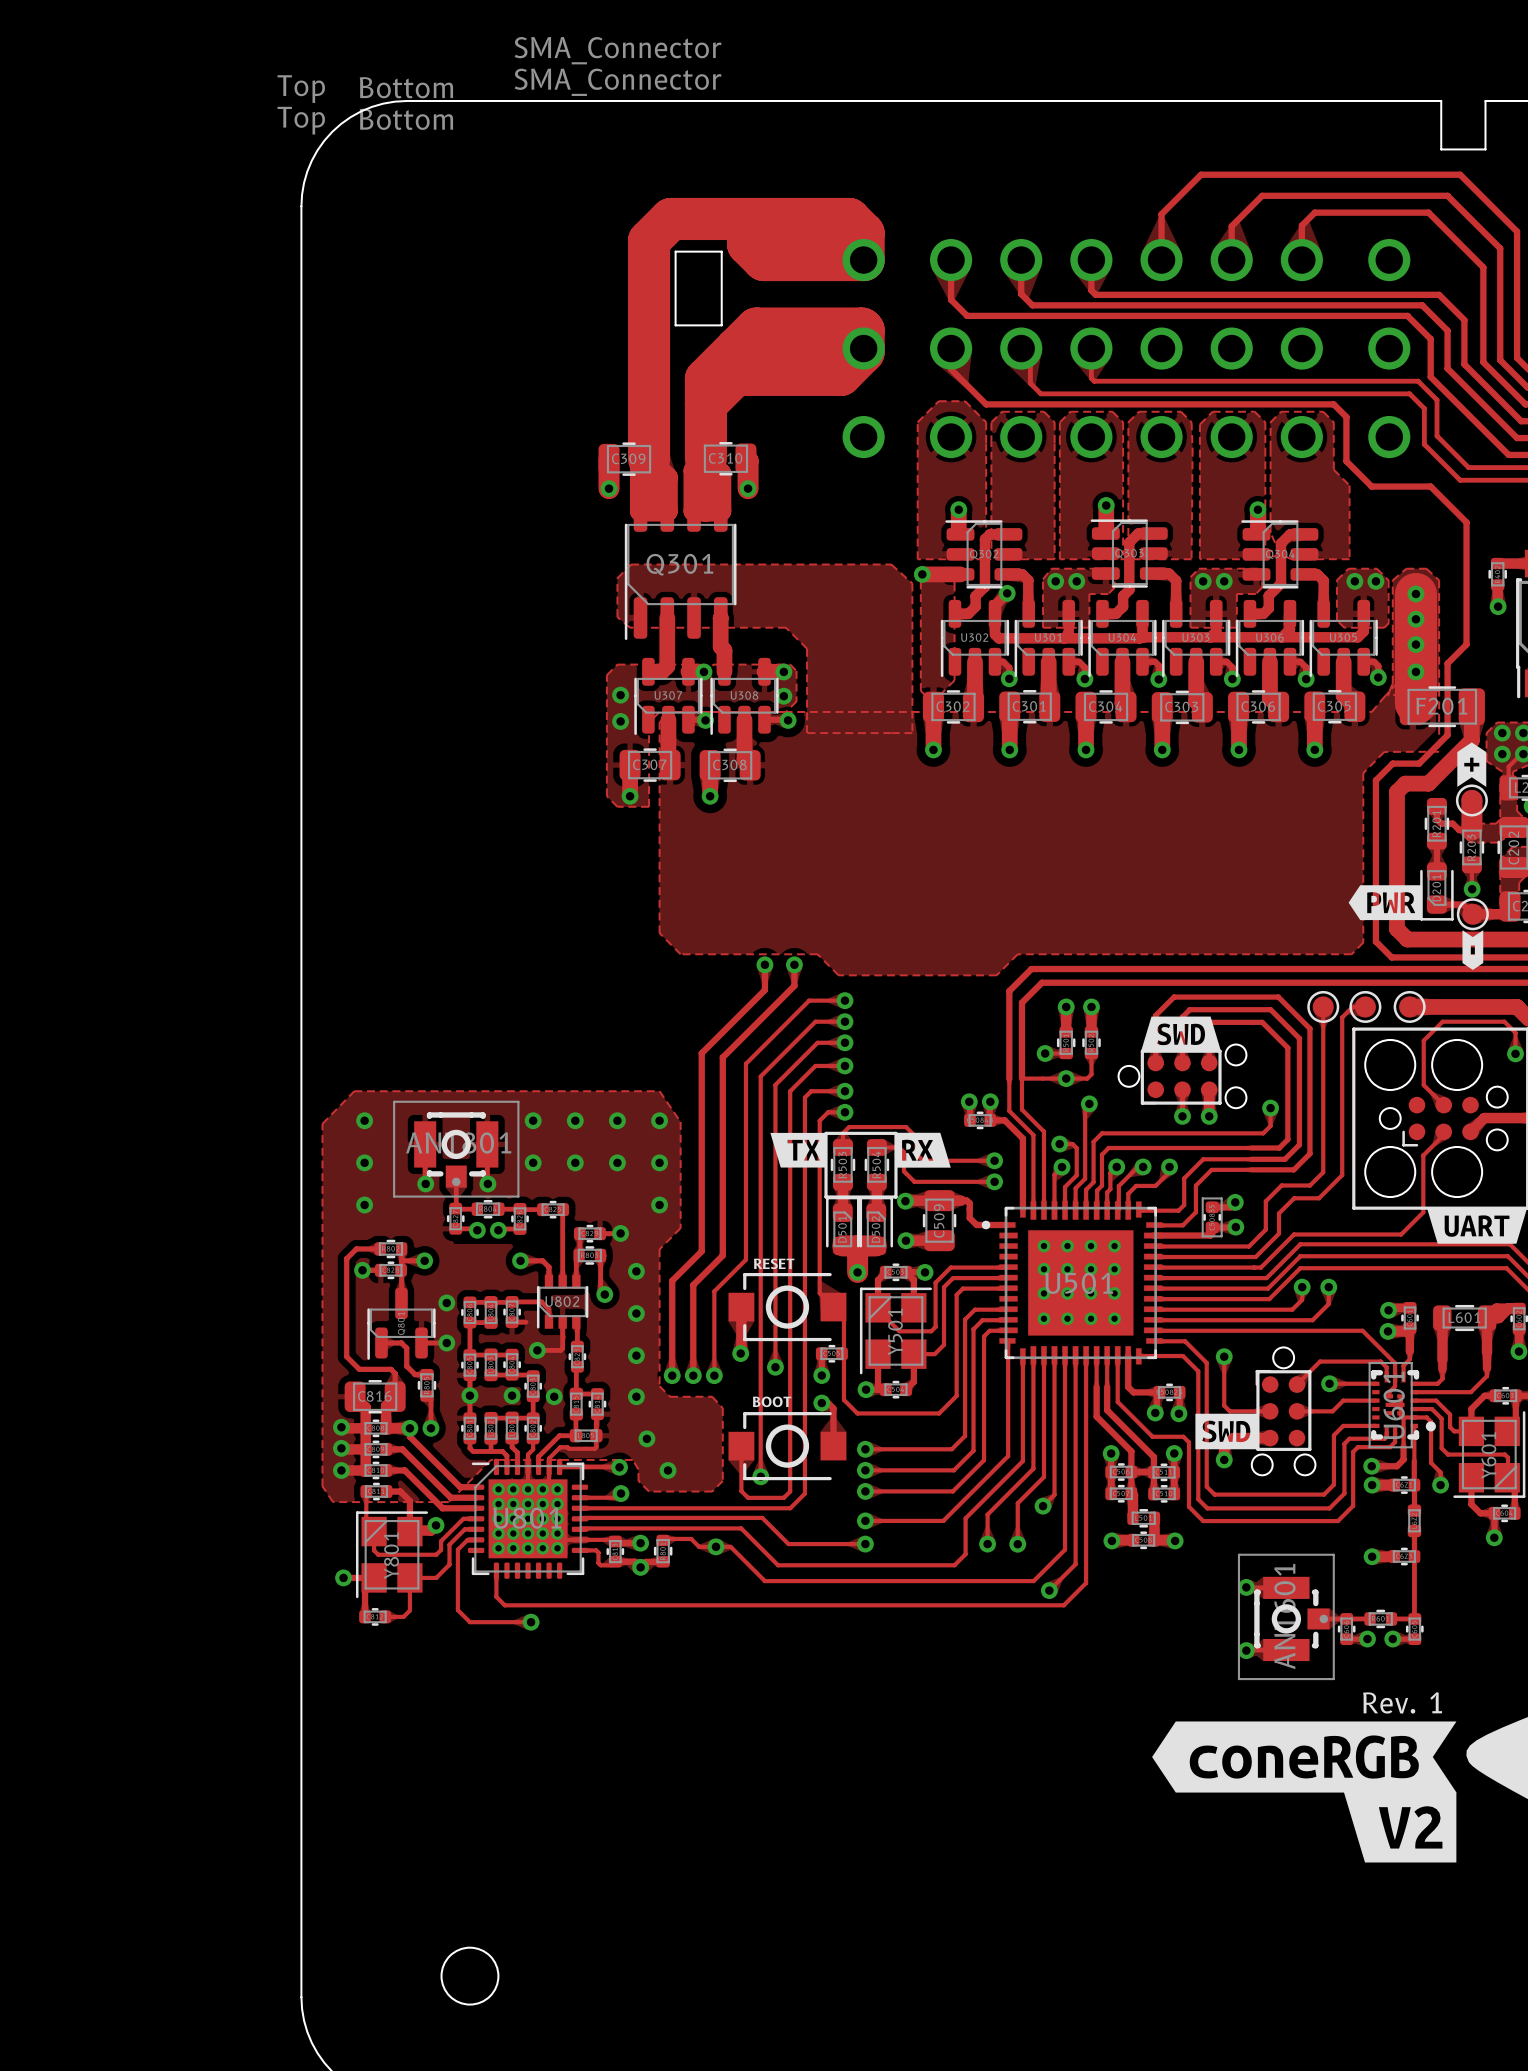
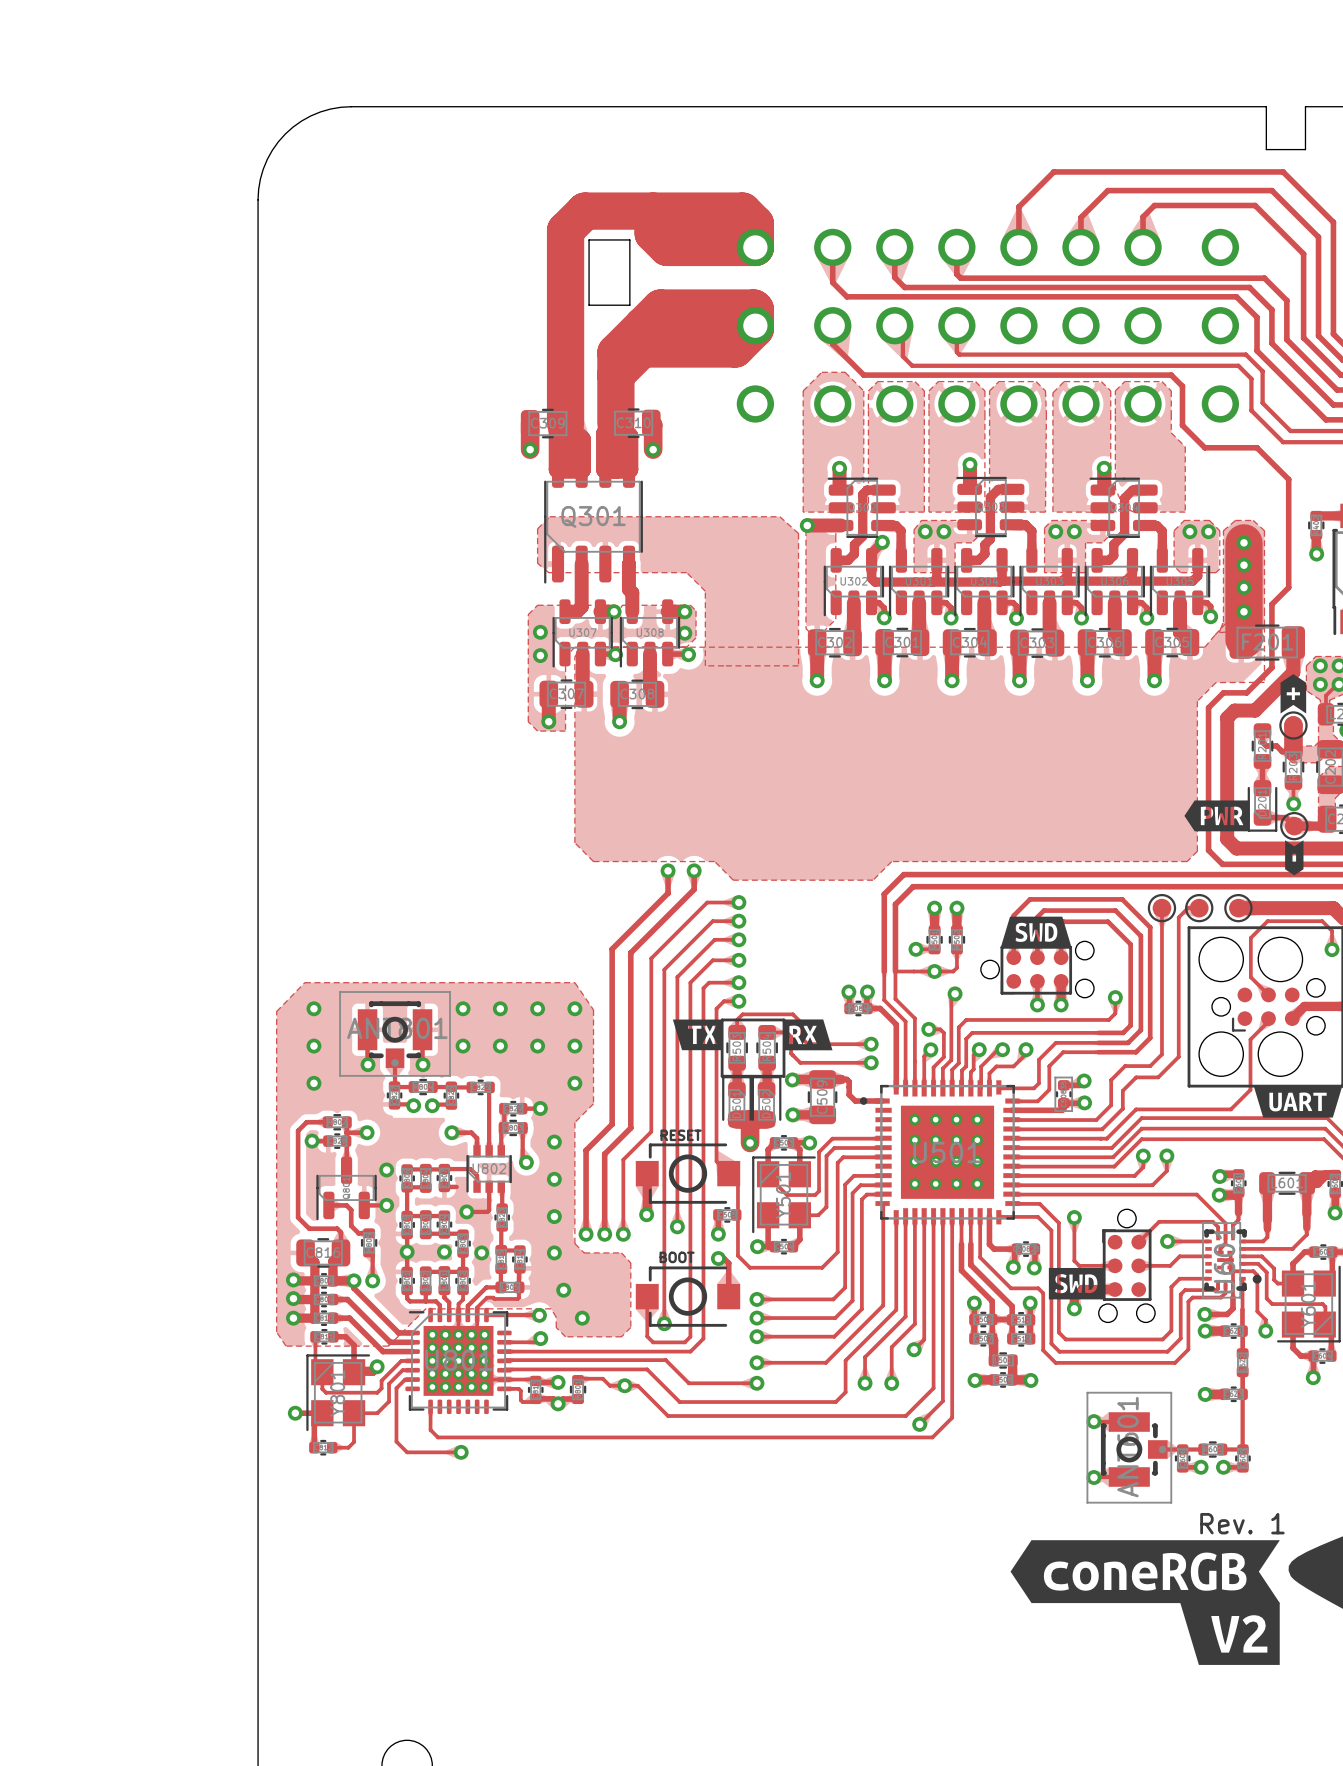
drawing: [277, 37, 722, 135] -> none

